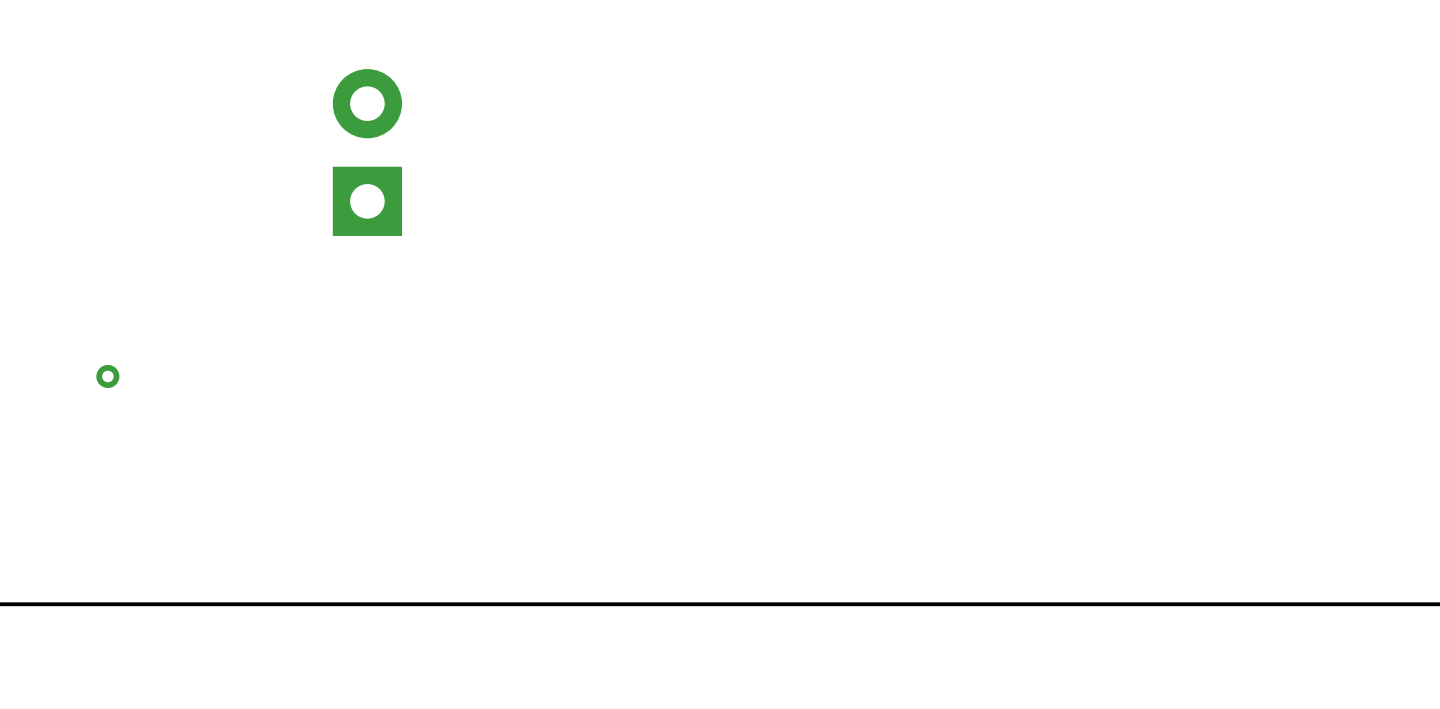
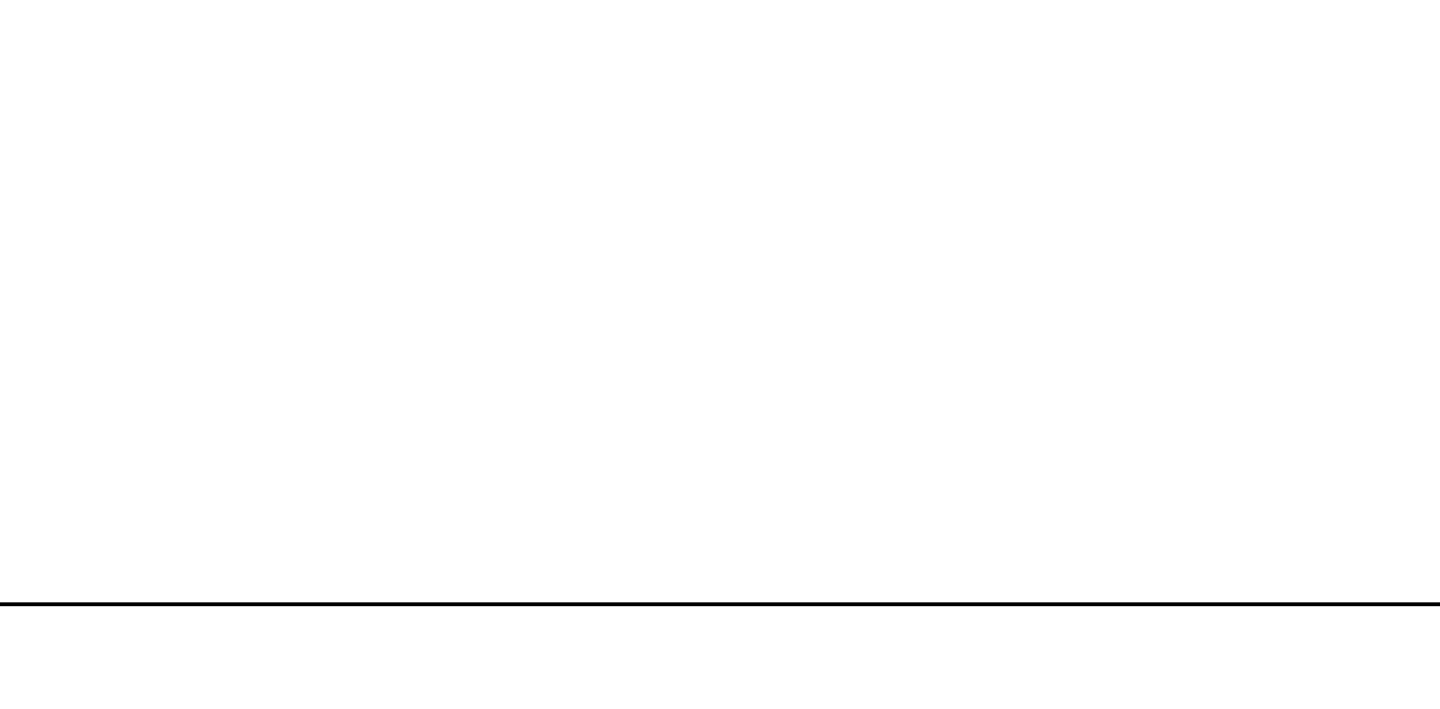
part: (367, 152) -> none
via: (107, 376) -> none

